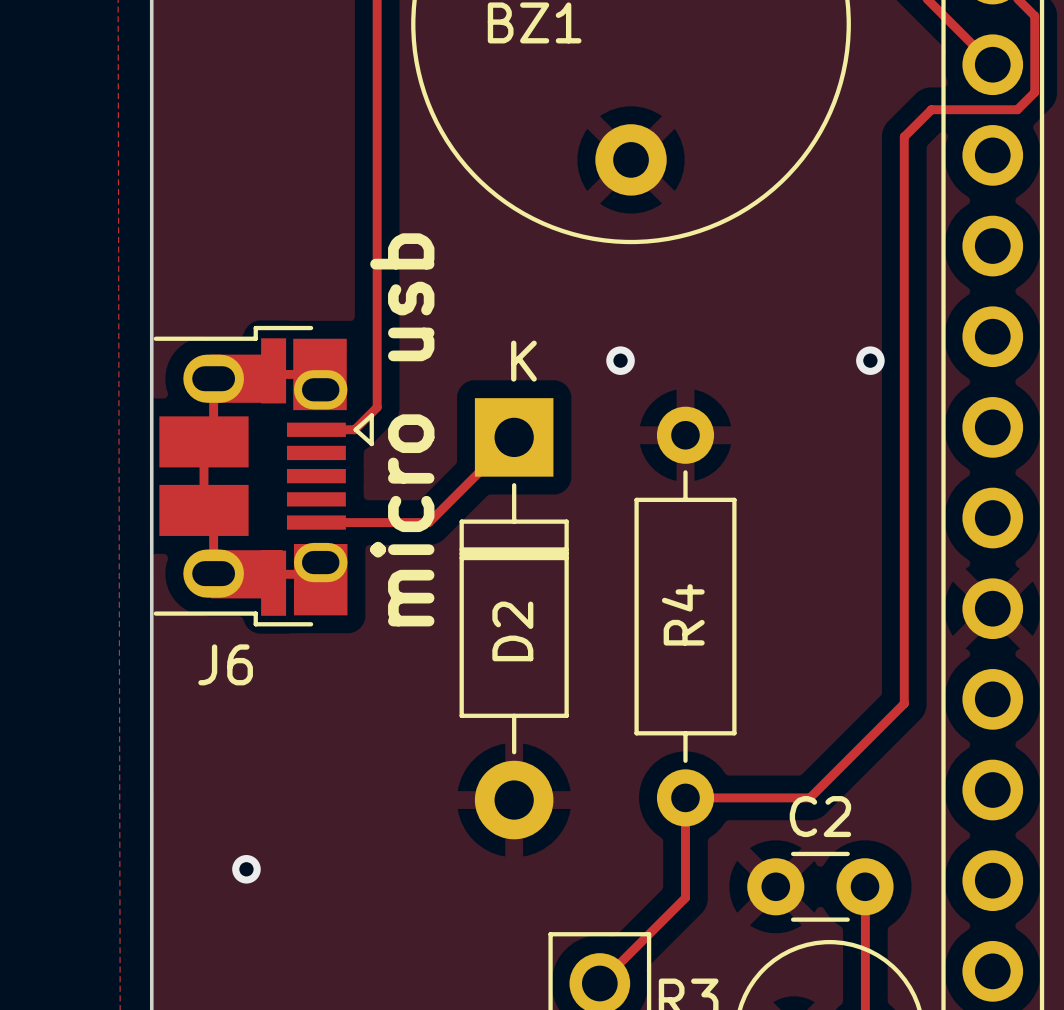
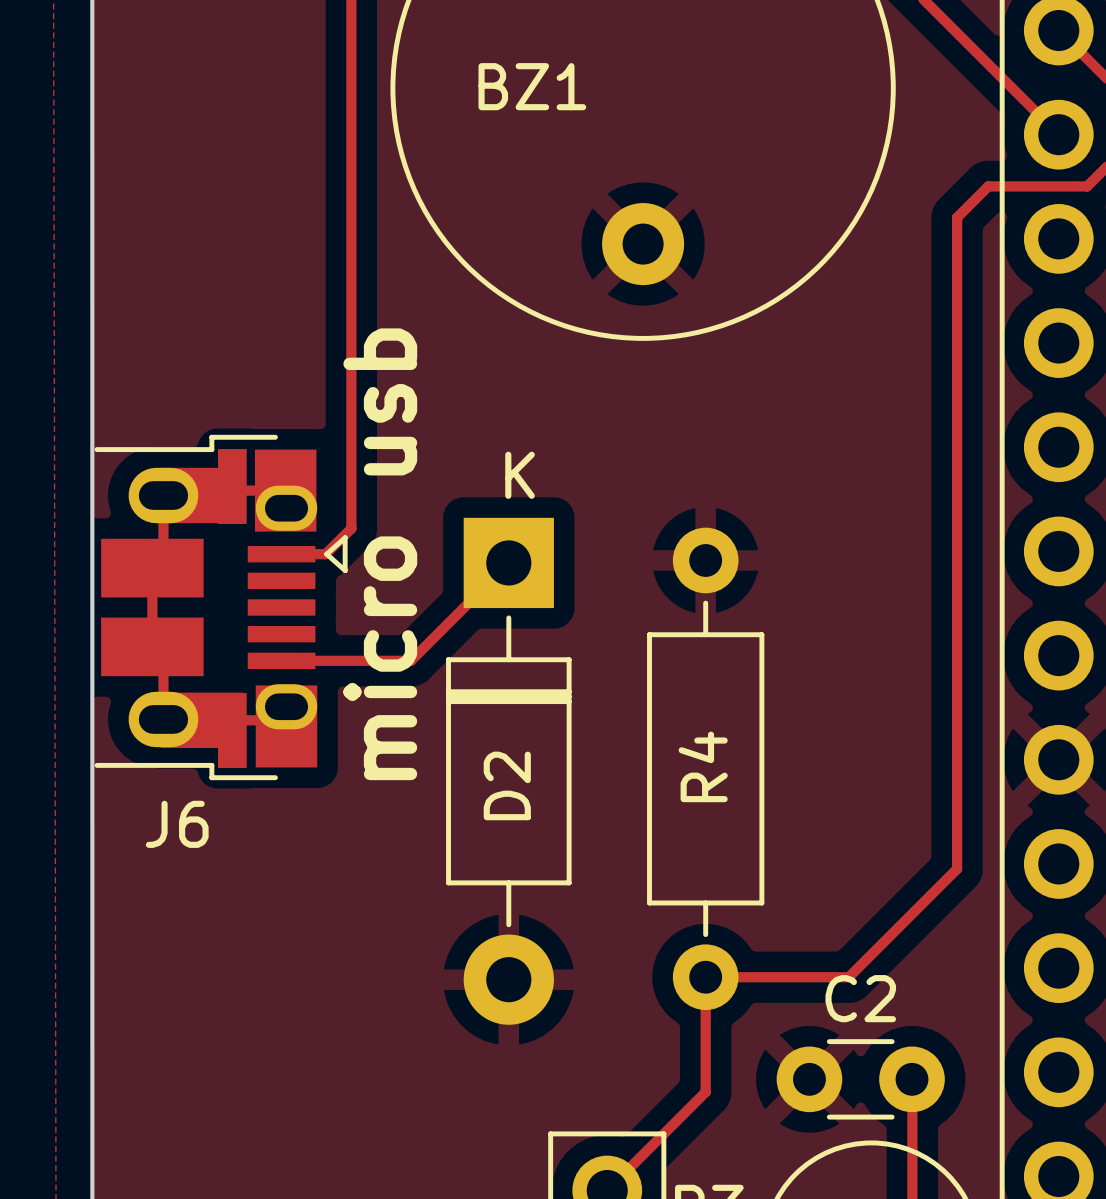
via: (620, 360) -> none
via: (870, 360) -> none
via: (246, 869) -> none

